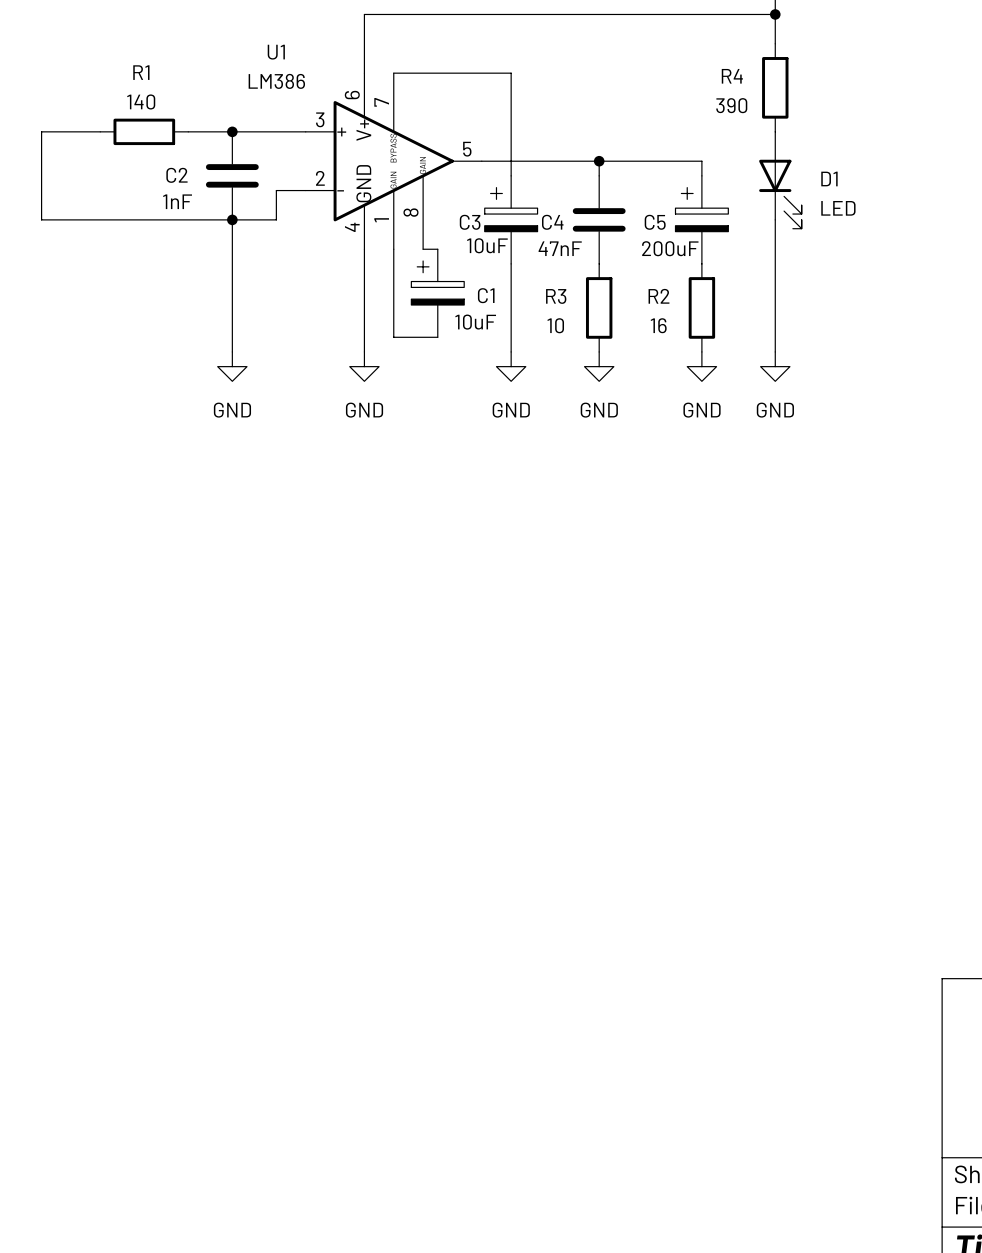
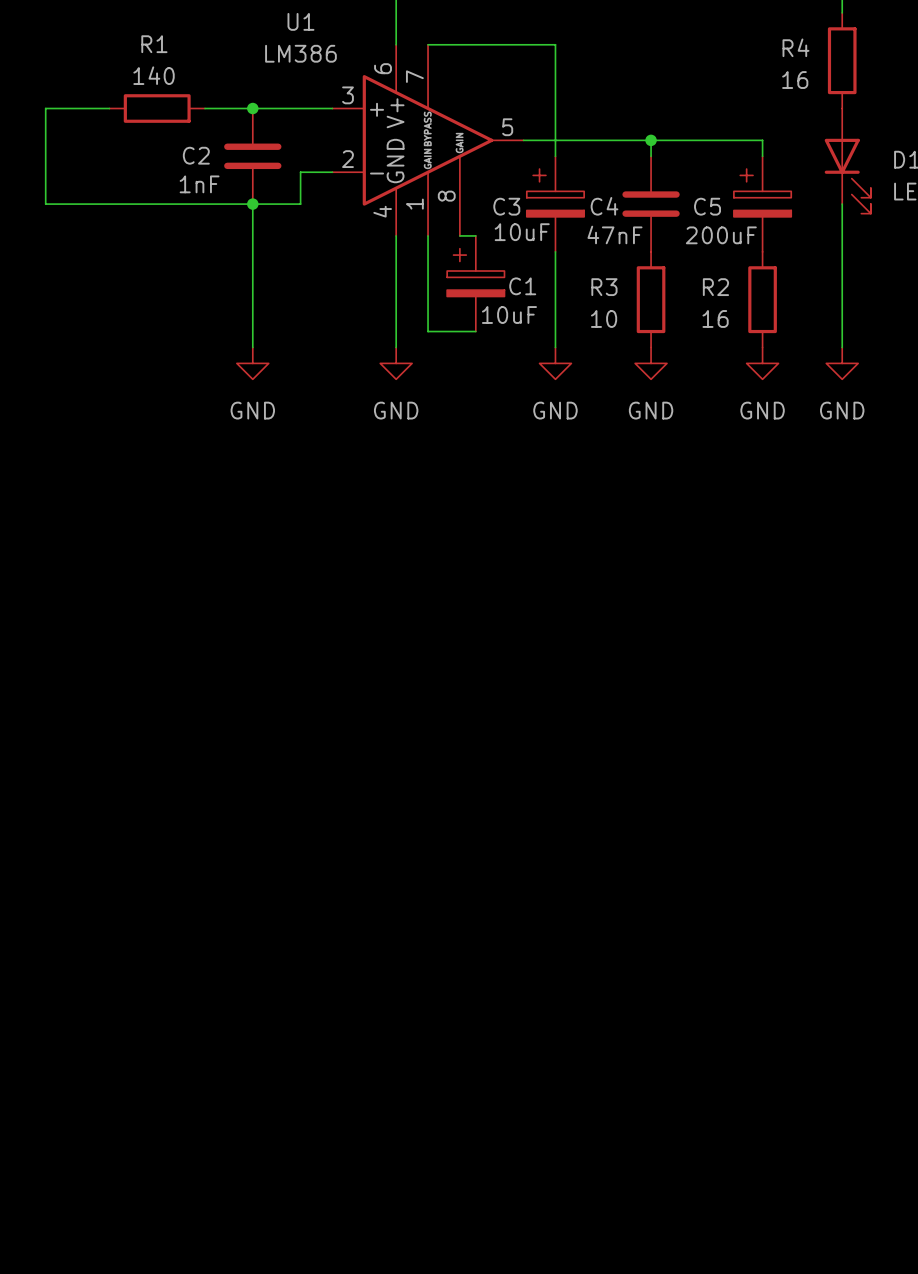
R4 value: 390 (731, 105) -> 16 (795, 80)

